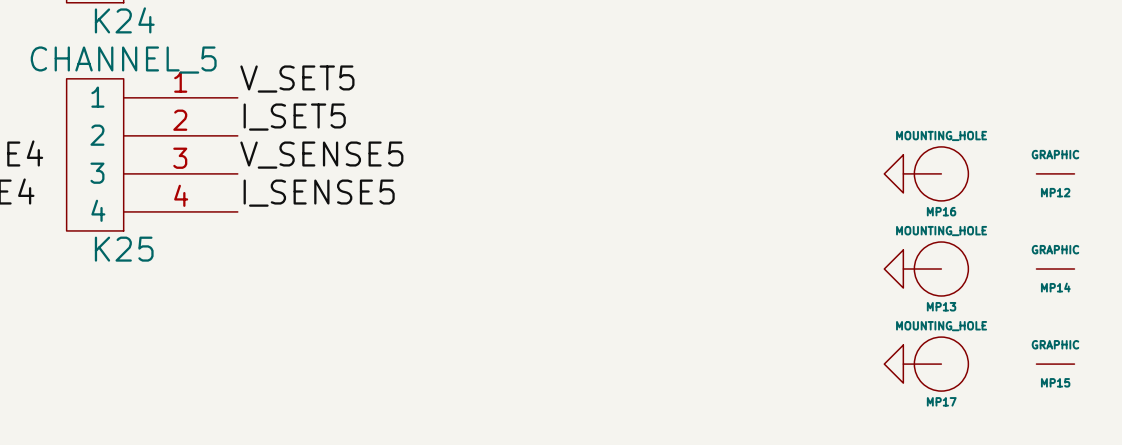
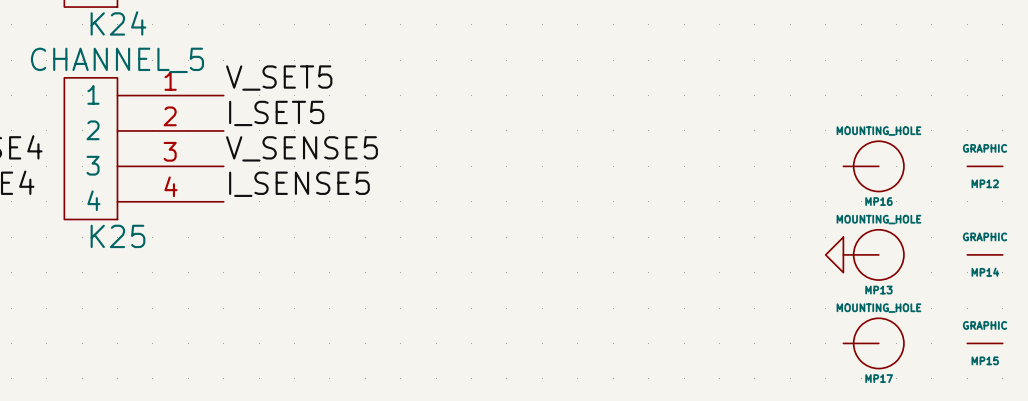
power symbol: (893, 173) -> none
power symbol: (893, 364) -> none

